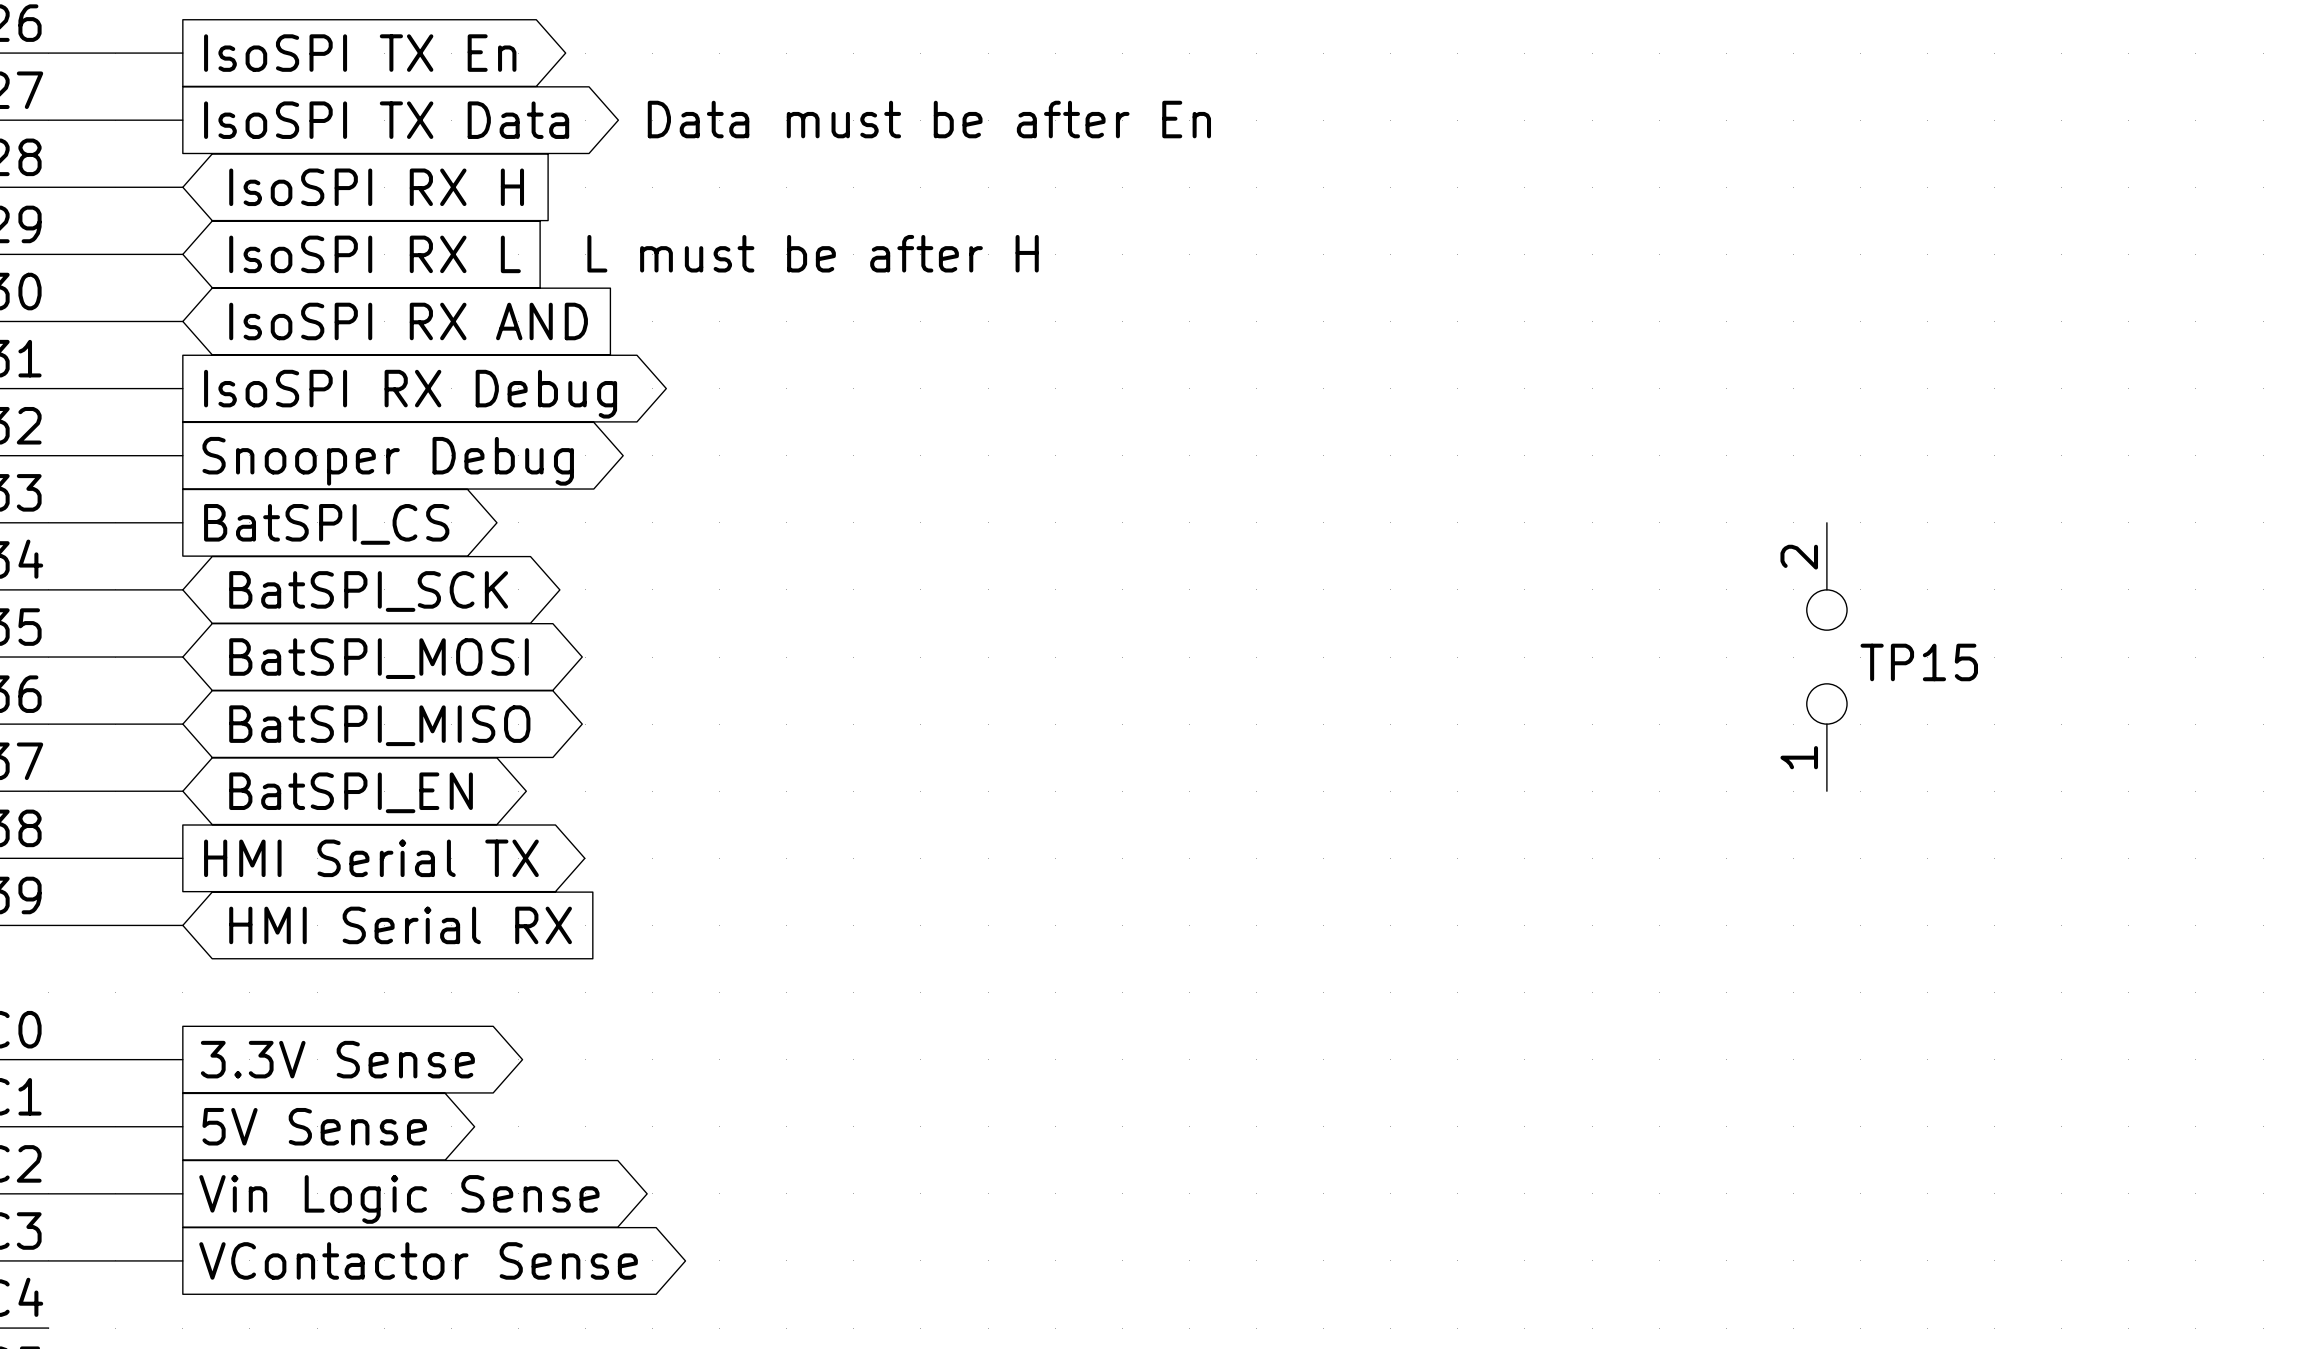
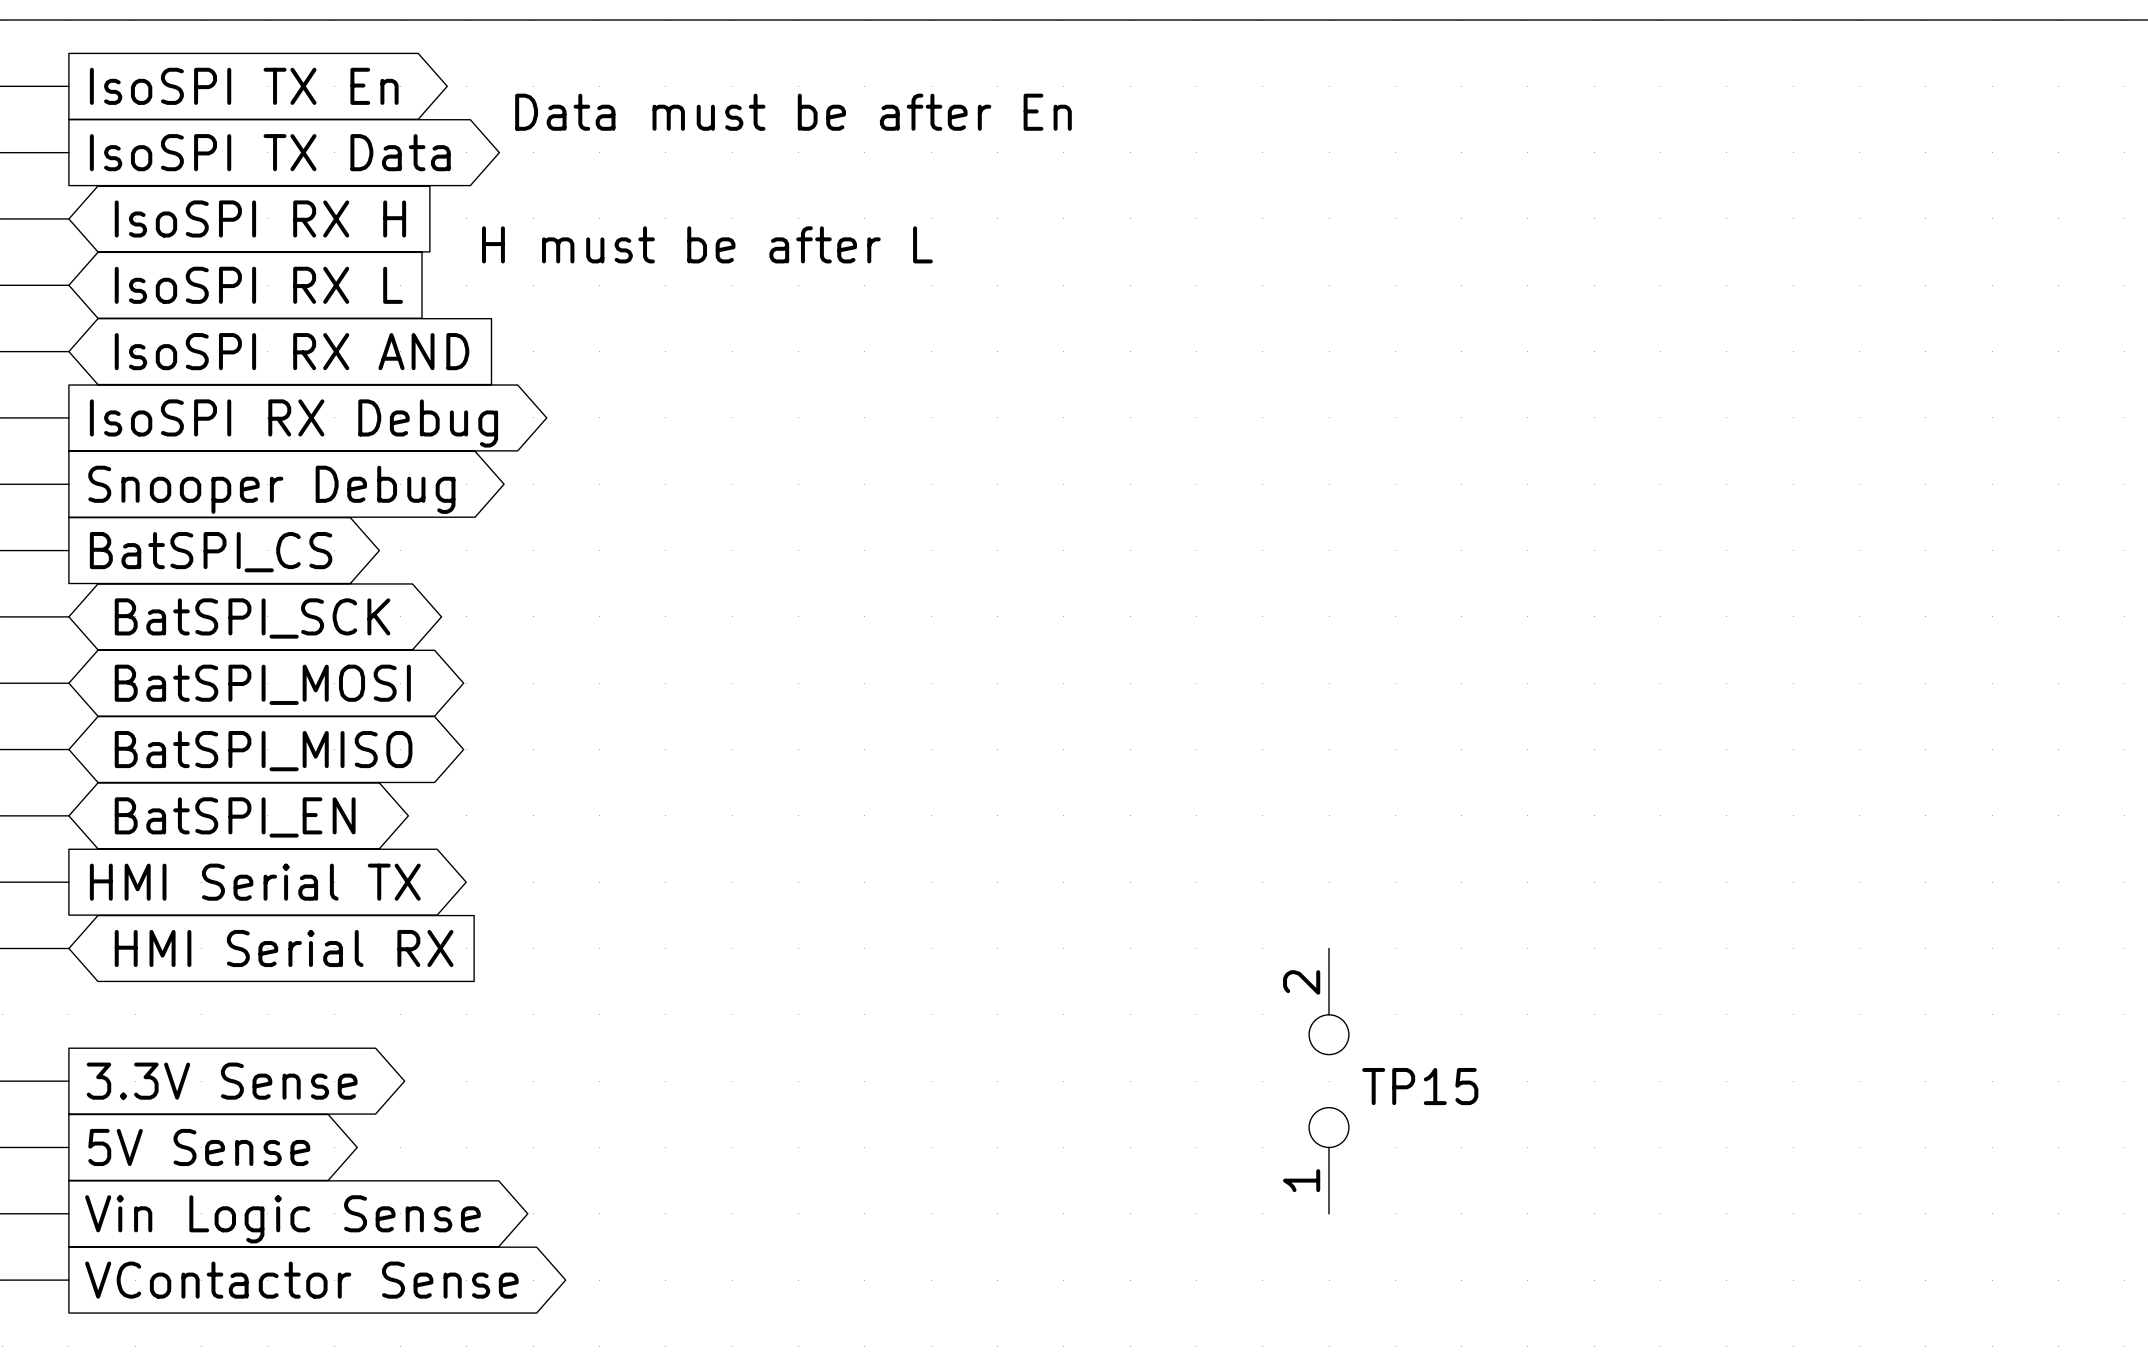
text position: Data must be after En (929, 119) -> Data must be after En (793, 112)
text: L must be after H (813, 253) -> H must be after L (707, 244)
TP15 position: (1826, 657) -> (1329, 1081)

